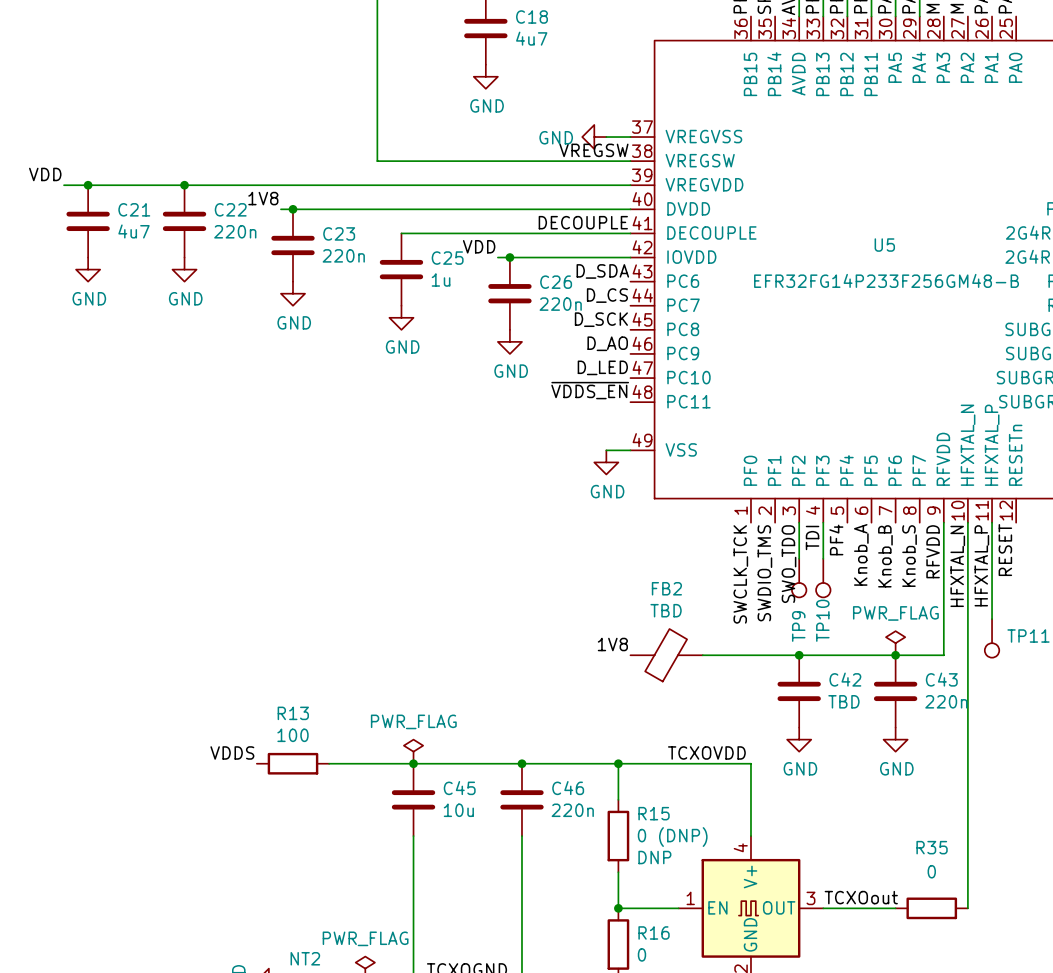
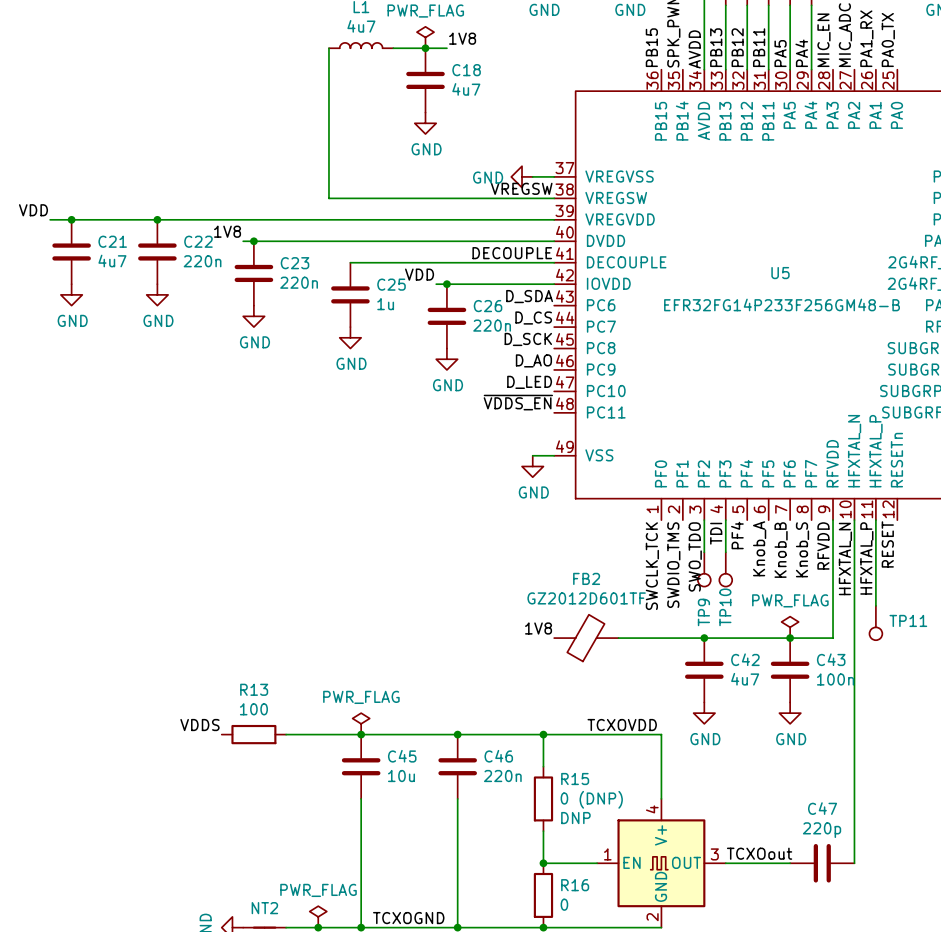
FB2 value: TBD (666, 610) -> GZ2012D601TF (586, 598)
C42 value: TBD (843, 701) -> 4u7 (745, 679)
C43 value: 220n (946, 701) -> 100n (835, 679)
R35: 0 (931, 908) -> none
C47: none -> 220p (822, 863)

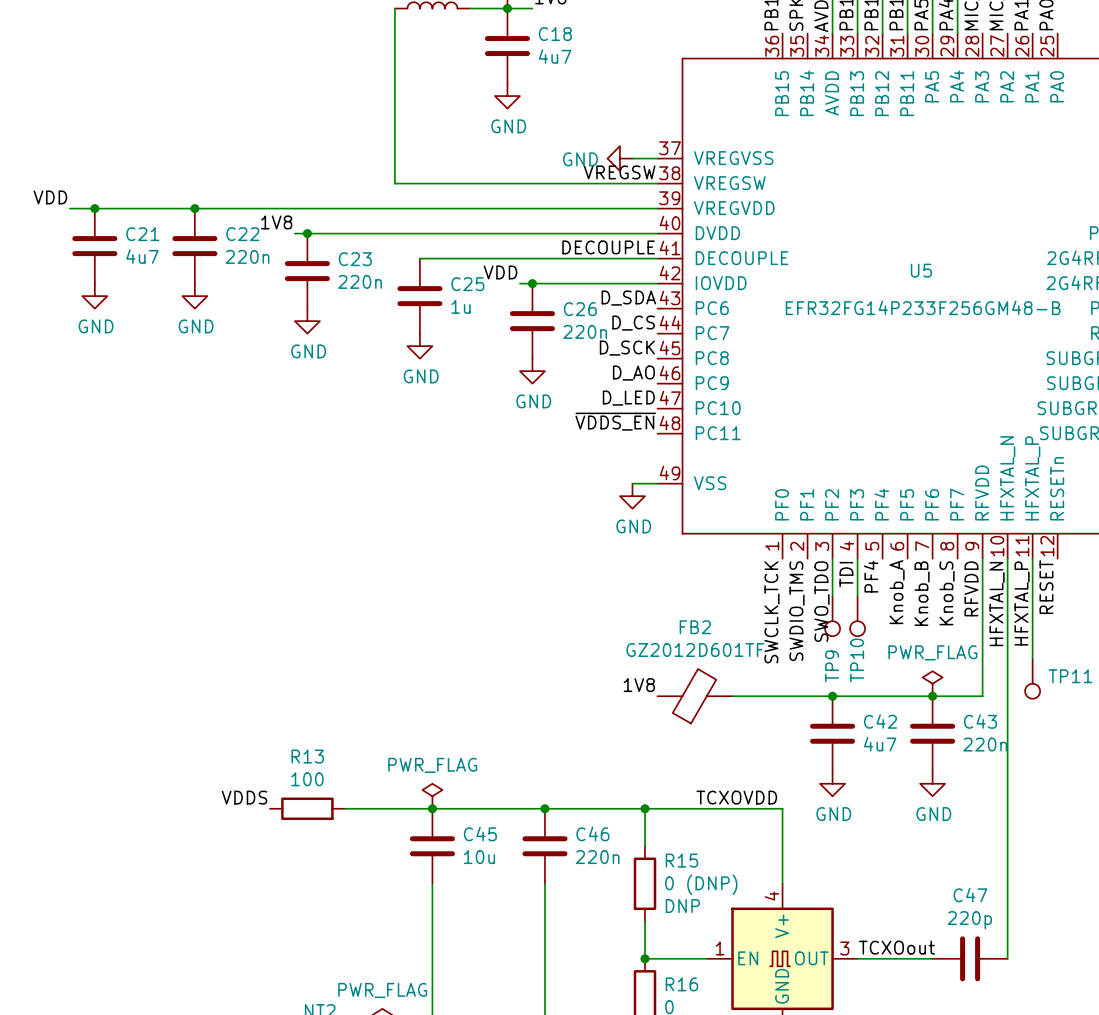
C43 value: 100n (835, 679) -> 220n (985, 744)

